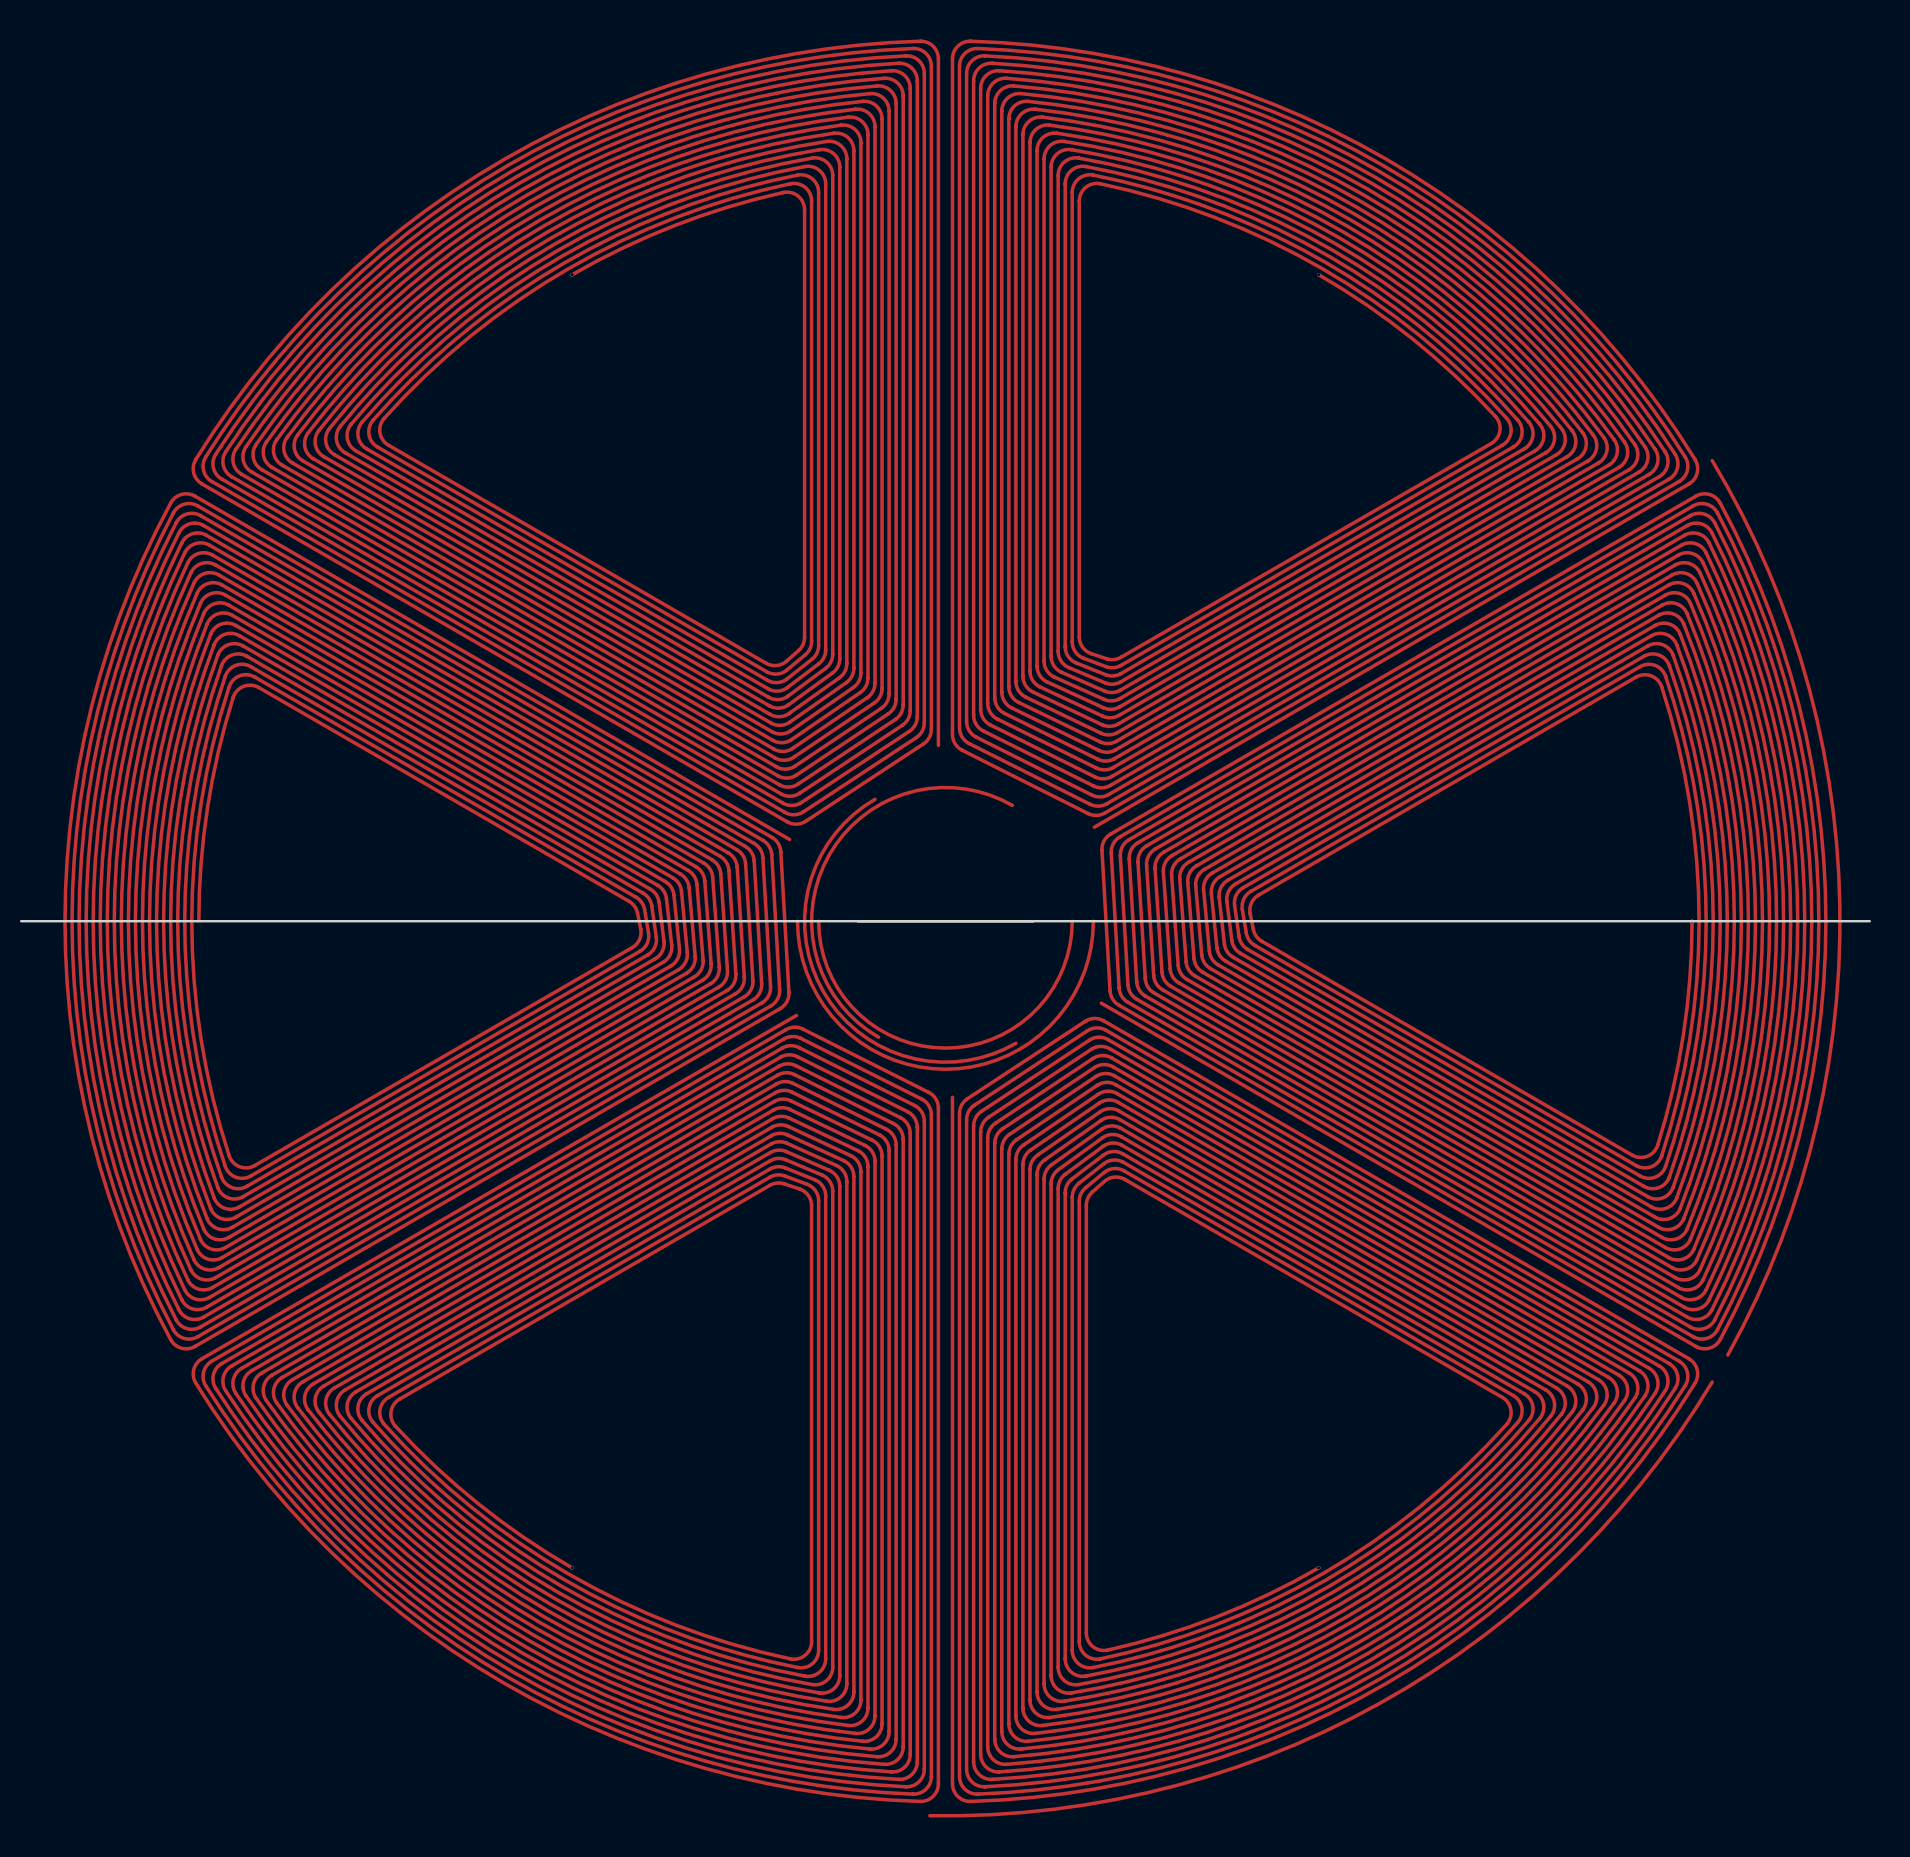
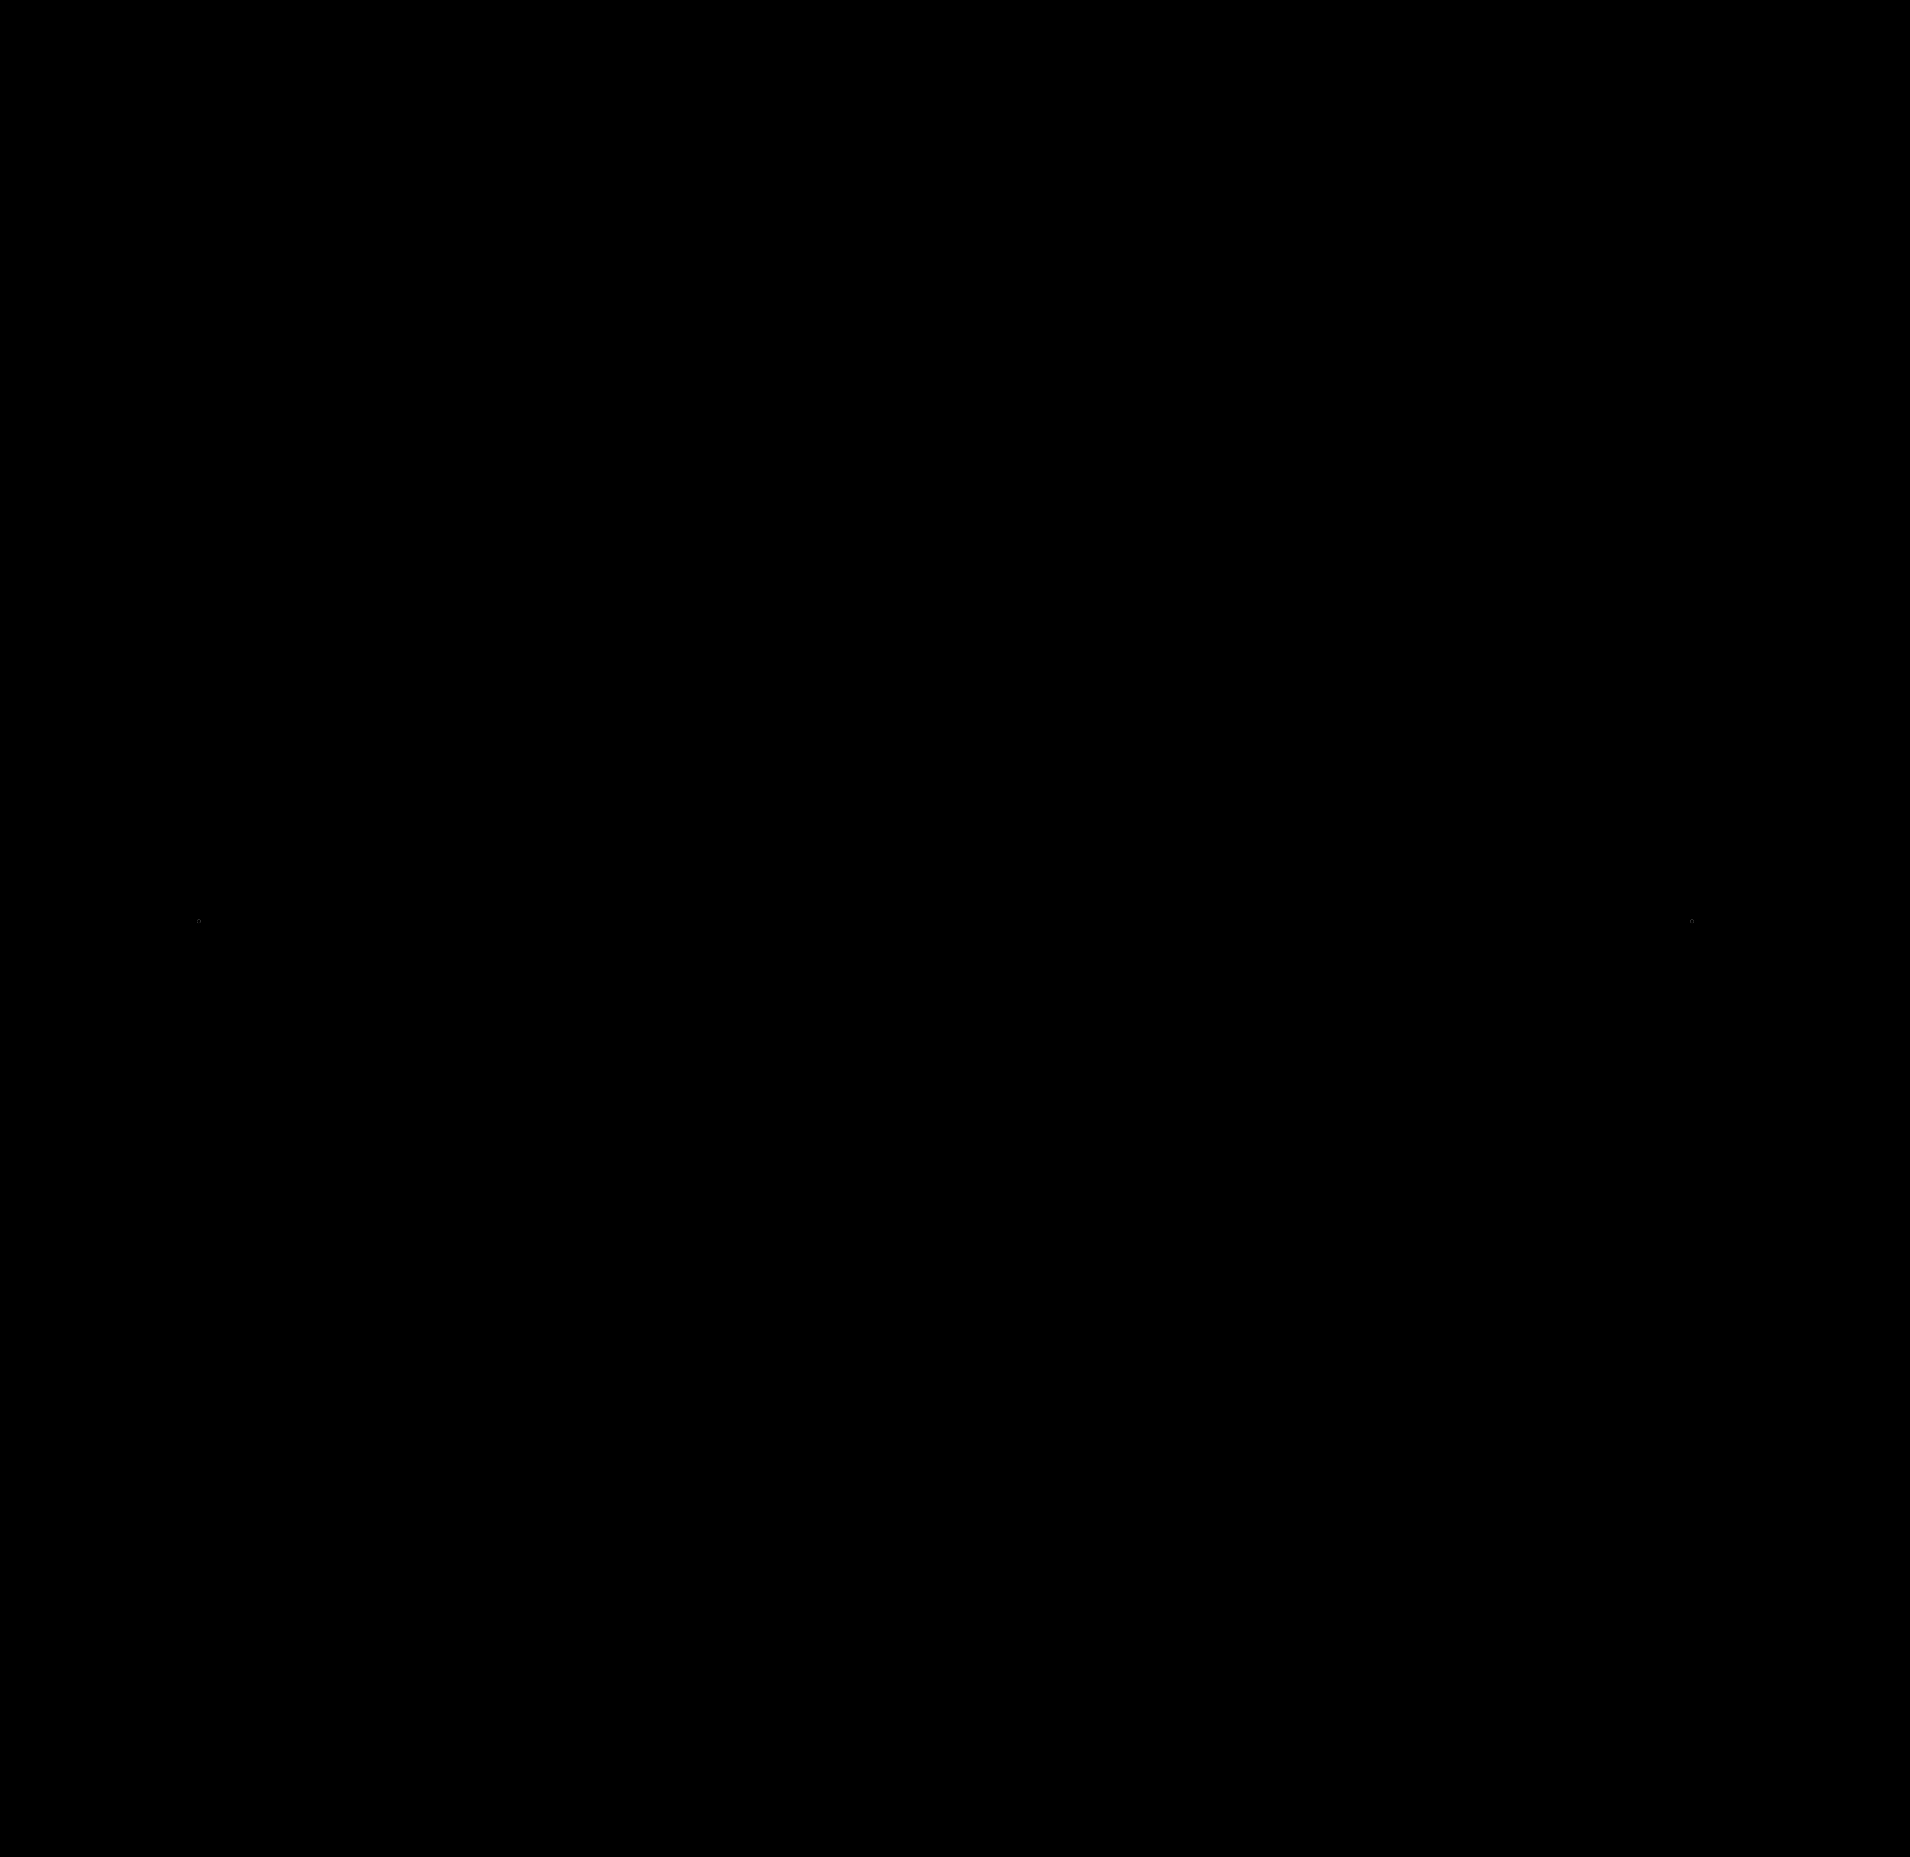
track: (572, 274) (648, 236) (728, 207) (785, 192) (794, 193) (802, 201) (804, 209) (804, 637) (799, 649) (780, 664) (772, 665) (766, 663) (388, 445) (382, 439) (379, 428) (382, 420) (404, 396) (470, 336) (543, 284) (594, 254) (676, 217) (732, 198) (792, 183) (801, 184) (809, 192) (811, 201) (811, 643) (806, 653) (781, 673) (774, 674) (766, 671) (377, 447) (370, 438) (368, 430) (371, 421) (391, 399) (451, 342) (518, 291) (589, 249) (664, 214) (743, 187) (799, 174) (808, 176) (816, 183) (818, 192) (818, 647) (813, 658) (783, 681) (775, 682) (767, 680) (366, 448) (359, 440) (357, 432) (362, 422) (401, 379) (465, 321) (536, 271) (586, 242) (665, 206) (748, 179) (807, 166) (817, 169) (823, 175) (825, 183) (825, 651) (820, 662) (783, 689) (775, 691) (768, 688) (355, 450) (348, 442) (347, 434) (349, 425) (370, 401) (435, 338) (506, 282) (558, 250) (638, 209) (724, 178) (814, 157) (822, 159) (830, 167) (832, 175) (832, 656) (827, 667) (784, 698) (776, 699) (768, 697) (345, 452) (338, 446) (336, 436) (340, 426) (377, 383) (439, 325) (506, 274) (554, 244) (630, 205) (709, 175) (763, 160) (819, 149) (829, 151) (837, 158) (839, 167) (839, 660) (834, 671) (784, 706) (777, 708) (769, 705) (334, 454) (328, 448) (325, 438) (329, 428) (367, 383) (431, 322) (477, 286) (551, 238) (629, 198) (712, 167) (768, 152) (826, 141) (837, 143) (844, 150) (846, 158) (846, 665) (841, 676) (785, 715) (777, 716) (770, 714) (323, 456) (316, 448) (315, 438) (318, 430) (358, 384) (423, 320) (495, 264) (574, 217) (657, 179) (744, 151) (833, 133) (844, 135) (851, 142) (853, 150) (853, 670) (848, 681) (788, 723) (780, 725) (770, 722) (313, 458) (306, 451) (304, 440) (308, 432) (326, 410) (364, 367) (426, 308) (495, 256) (569, 212) (647, 175) (728, 148) (784, 134) (841, 125) (851, 126) (858, 134) (860, 142) (860, 675) (855, 686) (788, 731) (781, 733) (771, 731) (302, 460) (295, 453) (294, 442) (297, 435) (334, 388) (397, 325) (465, 268) (540, 219) (592, 192) (647, 168) (731, 139) (789, 126) (848, 117) (858, 119) (865, 126) (867, 134) (867, 680) (864, 688) (860, 692) (789, 740) (780, 742) (772, 740) (292, 463) (285, 455) (283, 445) (287, 437) (325, 389) (389, 322) (459, 264) (536, 213) (591, 185) (647, 160) (734, 131) (794, 118) (855, 109) (865, 111) (873, 118) (875, 126) (874, 685) (871, 693) (867, 697) (790, 749) (781, 751) (773, 749) (282, 465) (275, 457) (273, 447) (276, 439) (294, 416) (331, 371) (392, 310) (460, 255) (533, 207) (611, 168) (664, 146) (720, 128) (776, 114) (862, 101) (872, 103) (880, 110) (882, 118) (881, 690) (878, 698) (874, 702) (790, 759) (782, 760) (775, 757) (271, 467) (264, 459) (263, 449) (266, 442) (284, 417) (322, 371) (385, 307) (454, 250) (529, 201) (609, 160) (665, 138) (722, 120) (810, 101) (869, 93) (879, 95) (887, 103) (889, 111) (888, 695) (887, 701) (881, 708) (791, 767) (783, 769) (776, 766) (261, 469) (254, 462) (253, 452) (256, 444) (274, 419) (312, 371) (377, 304) (448, 246) (526, 195) (580, 166) (637, 141) (725, 112) (785, 98) (846, 89) (881, 86) (888, 89) (894, 95) (896, 103) (896, 701) (894, 707) (888, 713) (792, 776) (785, 778) (777, 775) (251, 471) (244, 464) (243, 454) (245, 446) (264, 420) (303, 371) (369, 302) (443, 241) (522, 189) (607, 146) (667, 123) (727, 104) (789, 90) (852, 81) (888, 78) (895, 81) (901, 87) (903, 95) (903, 706) (899, 715) (895, 719) (794, 785) (786, 787) (779, 784) (241, 474) (234, 466) (232, 456) (235, 449) (252, 424) (289, 376) (351, 310) (419, 250) (468, 215) (519, 183) (599, 142) (655, 119) (713, 101) (801, 81) (861, 73) (895, 70) (907, 78) (910, 88) (910, 712) (906, 720) (902, 725) (796, 795) (788, 796) (781, 793) (231, 476) (224, 469) (222, 459) (225, 451) (243, 426) (280, 376) (343, 308) (389, 266) (437, 227) (515, 177) (570, 148) (627, 123) (715, 93) (775, 78) (836, 68) (900, 63) (908, 65) (914, 71) (917, 80) (917, 718) (915, 724) (909, 731) (797, 804) (790, 805) (782, 803) (221, 479) (214, 471) (213, 459) (233, 427) (271, 376) (335, 305) (407, 242) (458, 204) (512, 171) (568, 141) (626, 115) (717, 85) (779, 70) (842, 61) (907, 55) (915, 58) (921, 63) (924, 73) (924, 725) (922, 731) (916, 737) (799, 813) (792, 814) (784, 812) (211, 481) (204, 472) (203, 462) (222, 431) (258, 382) (297, 336) (339, 292) (384, 251) (432, 214) (508, 164) (562, 136) (617, 111) (674, 90) (733, 74) (792, 61) (852, 52) (915, 48) (922, 50) (928, 56) (931, 66) (931, 731) (928, 739) (923, 743) (803, 822) (794, 824) (787, 821) (202, 483) (195, 476) (193, 469) (194, 461) (230, 407) (268, 358) (309, 312) (354, 268) (402, 228) (452, 191) (505, 158) (588, 116) (646, 93) (705, 74) (765, 59) (827, 48) (889, 42) (926, 42) (934, 47) (938, 58) (938, 745) -> none
via: (572, 274) -> none
track: (1318, 274) (1389, 321) (1455, 376) (1496, 418) (1500, 428) (1497, 437) (1491, 443) (1120, 657) (1108, 659) (1085, 650) (1081, 645) (1079, 636) (1079, 201) (1081, 192) (1089, 184) (1098, 183) (1129, 190) (1214, 217) (1296, 254) (1347, 284) (1420, 336) (1465, 375) (1508, 420) (1511, 428) (1508, 439) (1502, 445) (1119, 666) (1107, 667) (1078, 655) (1074, 650) (1072, 641) (1072, 192) (1075, 181) (1082, 176) (1091, 174) (1120, 180) (1200, 204) (1276, 236) (1349, 276) (1417, 324) (1479, 379) (1519, 421) (1522, 432) (1519, 440) (1513, 447) (1119, 674) (1107, 675) (1072, 660) (1067, 654) (1065, 646) (1065, 183) (1067, 175) (1075, 167) (1086, 166) (1142, 179) (1225, 206) (1303, 242) (1354, 271) (1424, 321) (1489, 379) (1530, 423) (1533, 434) (1530, 442) (1524, 448) (1118, 682) (1107, 683) (1065, 665) (1060, 659) (1058, 651) (1058, 175) (1060, 167) (1068, 159) (1076, 157) (1108, 163) (1195, 188) (1279, 222) (1332, 250) (1408, 300) (1477, 358) (1541, 425) (1543, 436) (1541, 444) (1535, 450) (1118, 691) (1106, 691) (1058, 670) (1052, 664) (1051, 656) (1051, 167) (1054, 156) (1060, 151) (1071, 149) (1126, 160) (1208, 184) (1286, 217) (1336, 244) (1407, 290) (1472, 344) (1513, 383) (1550, 426) (1554, 436) (1551, 446) (1545, 452) (1118, 699) (1105, 700) (1050, 675) (1045, 668) (1044, 661) (1044, 158) (1046, 150) (1053, 143) (1064, 141) (1122, 152) (1206, 176) (1287, 210) (1339, 238) (1413, 286) (1481, 342) (1523, 383) (1561, 428) (1565, 438) (1562, 448) (1556, 454) (1117, 707) (1105, 708) (1043, 679) (1038, 673) (1037, 666) (1037, 150) (1040, 140) (1048, 134) (1057, 133) (1117, 144) (1204, 168) (1289, 203) (1369, 247) (1443, 300) (1511, 362) (1572, 430) (1575, 440) (1573, 450) (1567, 456) (1117, 716) (1104, 716) (1038, 686) (1031, 678) (1029, 671) (1029, 142) (1033, 132) (1041, 126) (1049, 125) (1078, 129) (1134, 140) (1216, 165) (1296, 199) (1371, 240) (1441, 290) (1506, 346) (1546, 388) (1582, 432) (1586, 442) (1583, 452) (1577, 458) (1116, 724) (1103, 725) (1031, 691) (1025, 685) (1022, 676) (1022, 134) (1026, 124) (1034, 118) (1042, 117) (1101, 126) (1187, 148) (1271, 179) (1350, 219) (1400, 251) (1448, 286) (1515, 345) (1555, 388) (1593, 435) (1596, 444) (1594, 455) (1587, 460) (1115, 733) (1109, 734) (1101, 733) (1024, 696) (1017, 688) (1015, 681) (1015, 126) (1018, 116) (1027, 110) (1035, 109) (1096, 118) (1185, 140) (1271, 172) (1353, 213) (1430, 264) (1478, 302) (1523, 344) (1565, 389) (1603, 437) (1607, 447) (1604, 457) (1598, 463) (1114, 742) (1108, 743) (1100, 741) (1017, 701) (1010, 694) (1008, 686) (1008, 118) (1011, 109) (1019, 102) (1028, 101) (1057, 104) (1114, 114) (1198, 137) (1279, 168) (1357, 207) (1406, 238) (1453, 272) (1519, 329) (1559, 371) (1614, 439) (1617, 449) (1614, 459) (1608, 465) (1113, 750) (1105, 752) (1099, 750) (1008, 705) (1003, 699) (1001, 692) (1001, 111) (1004, 101) (1012, 94) (1021, 93) (1050, 96) (1109, 106) (1196, 129) (1280, 160) (1361, 201) (1411, 233) (1460, 268) (1527, 328) (1588, 394) (1624, 442) (1627, 451) (1624, 461) (1618, 467) (1112, 759) (1106, 761) (1097, 759) (1001, 711) (996, 705) (994, 697) (994, 103) (997, 93) (1005, 87) (1013, 85) (1044, 89) (1105, 98) (1195, 121) (1281, 153) (1364, 195) (1416, 228) (1466, 264) (1535, 326) (1577, 371) (1616, 419) (1636, 448) (1637, 456) (1635, 464) (1629, 469) (1111, 768) (1102, 769) (1096, 768) (994, 717) (989, 710) (987, 703) (987, 95) (990, 86) (998, 79) (1006, 78) (1038, 81) (1101, 90) (1193, 113) (1282, 146) (1368, 189) (1447, 241) (1497, 281) (1543, 324) (1587, 371) (1626, 420) (1646, 450) (1647, 458) (1645, 466) (1639, 471) (1109, 777) (1103, 778) (1095, 777) (987, 722) (982, 716) (980, 709) (980, 88) (983, 78) (991, 72) (999, 70) (1029, 73) (1089, 81) (1177, 101) (1234, 119) (1290, 142) (1371, 183) (1422, 215) (1471, 250) (1539, 310) (1581, 353) (1637, 424) (1656, 452) (1656, 466) (1649, 474) (1108, 786) (1099, 787) (1093, 785) (980, 728) (975, 722) (973, 715) (973, 80) (976, 71) (984, 64) (992, 63) (1023, 65) (1084, 73) (1175, 93) (1263, 123) (1320, 148) (1375, 177) (1427, 210) (1477, 246) (1547, 308) (1590, 353) (1629, 401) (1666, 453) (1668, 461) (1666, 469) (1659, 476) (1106, 795) (1100, 796) (1091, 795) (973, 735) (968, 728) (966, 721) (966, 73) (970, 62) (978, 56) (1016, 57) (1080, 65) (1173, 85) (1234, 104) (1293, 127) (1378, 171) (1432, 204) (1483, 242) (1555, 305) (1598, 352) (1638, 401) (1676, 456) (1677, 463) (1676, 471) (1669, 479) (1104, 804) (1098, 806) (1090, 804) (965, 741) (961, 735) (959, 727) (959, 66) (963, 54) (971, 49) (1008, 50) (1068, 56) (1128, 67) (1187, 82) (1244, 100) (1301, 123) (1382, 164) (1433, 197) (1482, 232) (1529, 271) (1572, 313) (1613, 358) (1651, 406) (1686, 458) (1687, 466) (1685, 474) (1679, 481) (1102, 814) (1094, 815) (1088, 813) (960, 749) (955, 743) (952, 734) (952, 58) (955, 49) (961, 43) (968, 41) (1032, 45) (1094, 53) (1155, 66) (1215, 83) (1273, 104) (1330, 129) (1385, 158) (1463, 209) (1512, 248) (1559, 289) (1602, 334) (1641, 382) (1678, 433) (1697, 465) (1695, 476) (1688, 483) (1094, 827) -> none
via: (1318, 274) -> none
track: (1712, 460) (1742, 515) (1768, 571) (1800, 659) (1817, 720) (1828, 781) (1836, 843) (1839, 905) (1836, 999) (1828, 1061) (1817, 1122) (1800, 1182) (1780, 1241) (1756, 1299) (1727, 1355) -> none
track: (875, 799) (853, 814) (835, 833) (821, 854) (811, 878) (805, 904) (806, 942) (812, 968) (823, 991) (838, 1012) (857, 1031) (890, 1051) (915, 1058) (941, 1062) (967, 1060) (992, 1054) (1015, 1043) -> none
track: (1012, 805) (989, 795) (965, 789) (941, 787) (916, 790) (893, 798) (871, 809) (852, 825) (829, 854) (819, 876) (813, 900) (812, 937) (817, 961) (827, 984) (841, 1005) (858, 1022) (878, 1037) -> none
track: (789, 839) (194, 496) (185, 493) (174, 498) (156, 530) (130, 587) (109, 645) (91, 705) (78, 766) (69, 828) (64, 921) (67, 983) (73, 1045) (84, 1106) (99, 1167) (119, 1226) (143, 1283) (171, 1341) (177, 1346) (185, 1348) (194, 1346) (780, 1008) (786, 1001) (788, 994) (780, 851) (779, 845) (773, 838) (197, 505) (188, 503) (180, 505) (174, 511) (146, 567) (124, 623) (105, 681) (90, 740) (80, 800) (74, 860) (72, 921) (76, 1012) (85, 1072) (97, 1131) (114, 1190) (135, 1247) (159, 1302) (177, 1334) (188, 1339) (197, 1336) (770, 1005) (776, 1000) (779, 993) (771, 854) (770, 848) (764, 841) (200, 515) (190, 513) (183, 515) (177, 521) (148, 580) (126, 639) (107, 700) (93, 762) (84, 825) (79, 921) (81, 984) (88, 1048) (107, 1141) (136, 1232) (162, 1291) (179, 1324) (190, 1329) (200, 1326) (761, 1002) (767, 997) (770, 990) (762, 857) (761, 851) (755, 844) (203, 525) (193, 523) (185, 525) (180, 531) (152, 589) (131, 647) (113, 706) (100, 767) (91, 828) (86, 921) (91, 1014) (100, 1075) (113, 1136) (141, 1224) (165, 1281) (178, 1309) (184, 1316) (193, 1319) (203, 1317) (752, 999) (758, 994) (761, 987) (754, 860) (751, 852) (747, 847) (206, 535) (196, 532) (184, 539) (168, 570) (146, 625) (119, 712) (101, 801) (95, 861) (93, 921) (95, 981) (101, 1041) (119, 1130) (146, 1216) (168, 1272) (181, 1299) (187, 1306) (196, 1309) (206, 1307) (744, 996) (749, 991) (752, 984) (745, 863) (744, 857) (738, 850) (209, 545) (201, 542) (193, 544) (187, 549) (171, 581) (148, 640) (129, 701) (109, 794) (102, 857) (100, 921) (105, 1016) (121, 1110) (148, 1201) (171, 1261) (184, 1289) (189, 1296) (199, 1299) (209, 1297) (735, 993) (741, 988) (744, 981) (737, 867) (734, 858) (730, 854) (212, 555) (204, 552) (196, 554) (189, 559) (175, 590) (152, 648) (134, 707) (121, 767) (112, 828) (107, 921) (112, 1013) (127, 1105) (152, 1194) (175, 1251) (187, 1279) (192, 1286) (202, 1289) (212, 1287) (727, 990) (732, 985) (735, 977) (728, 870) (726, 862) (721, 857) (215, 565) (207, 562) (197, 565) (190, 572) (167, 628) (140, 713) (127, 772) (119, 831) (114, 921) (119, 1011) (133, 1099) (157, 1186) (178, 1242) (190, 1269) (195, 1276) (205, 1279) (215, 1277) (718, 987) (724, 981) (727, 974) (720, 873) (718, 865) (713, 860) (218, 575) (210, 572) (200, 575) (193, 583) (162, 664) (146, 720) (134, 776) (125, 834) (121, 921) (125, 1008) (139, 1094) (162, 1178) (182, 1232) (193, 1259) (199, 1266) (208, 1269) (218, 1267) (710, 983) (716, 978) (719, 969) (712, 877) (711, 870) (705, 864) (222, 585) (214, 582) (203, 585) (197, 593) (174, 650) (156, 708) (142, 768) (133, 829) (128, 921) (133, 1013) (149, 1103) (174, 1192) (197, 1249) (202, 1256) (211, 1259) (222, 1257) (702, 980) (708, 974) (711, 965) (704, 880) (703, 874) (697, 867) (225, 595) (217, 592) (207, 595) (200, 603) (179, 658) (161, 715) (144, 802) (137, 861) (135, 921) (140, 1010) (154, 1098) (179, 1183) (200, 1239) (205, 1245) (215, 1249) (225, 1247) (694, 976) (700, 971) (703, 962) (696, 882) (689, 871) (228, 605) (220, 602) (210, 605) (203, 613) (183, 667) (167, 722) (150, 806) (142, 892) (144, 978) (155, 1064) (175, 1147) (193, 1202) (203, 1228) (208, 1235) (218, 1239) (228, 1237) (686, 973) (692, 967) (695, 958) (688, 885) (682, 875) (232, 615) (224, 612) (213, 615) (207, 623) (177, 710) (158, 799) (150, 890) (151, 982) (164, 1072) (186, 1161) (207, 1218) (212, 1225) (221, 1229) (232, 1227) (678, 969) (684, 964) (687, 956) (681, 889) (674, 878) (235, 625) (227, 623) (217, 626) (210, 634) (191, 689) (176, 746) (161, 833) (156, 921) (158, 980) (170, 1067) (191, 1152) (210, 1208) (217, 1216) (225, 1219) (235, 1217) (670, 966) (676, 960) (679, 953) (673, 892) (666, 882) (239, 635) (231, 633) (220, 636) (214, 644) (196, 698) (181, 753) (168, 836) (163, 921) (168, 1005) (176, 1061) (196, 1144) (214, 1197) (220, 1206) (228, 1209) (239, 1206) (663, 962) (668, 956) (671, 949) (666, 896) (659, 886) (243, 645) (234, 643) (226, 645) (218, 653) (191, 741) (175, 830) (170, 921) (175, 1011) (185, 1071) (207, 1158) (218, 1189) (224, 1195) (234, 1199) (243, 1196) (655, 958) (661, 953) (664, 945) (658, 900) (652, 890) (246, 656) (238, 653) (228, 657) (222, 663) (204, 720) (186, 805) (178, 892) (178, 950) (186, 1036) (204, 1121) (221, 1176) (228, 1185) (238, 1188) (246, 1186) (647, 954) (653, 949) (656, 941) (651, 903) (644, 894) (250, 666) (242, 664) (233, 666) (226, 674) (209, 729) (192, 810) (185, 893) (186, 976) (197, 1059) (216, 1140) (226, 1168) (231, 1175) (242, 1178) (250, 1175) (639, 951) (646, 945) (648, 939) (644, 907) (637, 898) (254, 677) (246, 674) (235, 677) (230, 684) (212, 744) (197, 832) (192, 891) (194, 980) (201, 1040) (220, 1127) (230, 1157) (235, 1164) (243, 1167) (254, 1165) (632, 947) (637, 943) (640, 935) (637, 911) (629, 901) (258, 687) (250, 685) (239, 688) (233, 695) (218, 752) (203, 836) (198, 921) -> none
track: (797, 921) (799, 947) (806, 971) (824, 1006) (840, 1025) (860, 1042) (894, 1060) (919, 1066) (945, 1069) (971, 1066) (996, 1060) (1030, 1042) (1050, 1025) (1066, 1006) (1084, 971) (1091, 947) (1093, 921) -> none
track: (818, 921) (820, 944) (827, 967) (837, 988) (851, 1006) (869, 1022) (899, 1039) (922, 1045) (945, 1048) (968, 1045) (991, 1039) (1012, 1029) (1030, 1015) (1053, 988) (1063, 967) (1070, 944) (1072, 921) -> none
track: (1692, 921) (1687, 1006) (1672, 1090) (1656, 1147) (1651, 1154) (1640, 1157) (1632, 1155) (1261, 941) (1253, 931) (1250, 907) (1253, 899) (1258, 895) (1636, 677) (1646, 674) (1655, 677) (1660, 684) (1670, 715) (1689, 802) (1696, 861) (1698, 951) (1689, 1040) (1677, 1098) (1660, 1157) (1655, 1164) (1644, 1167) (1636, 1165) (1253, 944) (1246, 934) (1242, 903) (1244, 897) (1250, 891) (1640, 666) (1648, 664) (1659, 667) (1664, 674) (1674, 702) (1693, 783) (1704, 865) (1705, 949) (1698, 1031) (1681, 1113) (1664, 1168) (1657, 1176) (1648, 1178) (1640, 1175) (1246, 948) (1239, 938) (1234, 901) (1237, 893) (1243, 887) (1643, 656) (1652, 653) (1662, 657) (1669, 665) (1686, 720) (1704, 805) (1711, 863) (1712, 950) (1704, 1036) (1686, 1121) (1668, 1178) (1660, 1186) (1652, 1188) (1643, 1186) (1238, 952) (1232, 942) (1226, 897) (1229, 889) (1235, 883) (1647, 645) (1656, 643) (1666, 646) (1672, 653) (1682, 683) (1705, 771) (1717, 861) (1720, 921) (1714, 1011) (1699, 1100) (1672, 1189) (1664, 1197) (1656, 1199) (1647, 1196) (1231, 956) (1224, 946) (1219, 893) (1221, 885) (1227, 880) (1651, 635) (1659, 633) (1670, 636) (1676, 644) (1694, 698) (1714, 780) (1722, 836) (1727, 921) (1722, 1005) (1708, 1089) (1694, 1144) (1676, 1197) (1670, 1206) (1659, 1209) (1651, 1206) (1223, 959) (1217, 949) (1211, 889) (1214, 882) (1220, 876) (1655, 625) (1663, 623) (1673, 626) (1680, 634) (1699, 689) (1720, 775) (1729, 833) (1734, 921) (1729, 1009) (1714, 1096) (1699, 1152) (1680, 1208) (1673, 1216) (1663, 1219) (1655, 1217) (1216, 963) (1209, 953) (1203, 885) (1206, 878) (1212, 872) (1658, 615) (1668, 613) (1678, 617) (1683, 623) (1704, 681) (1726, 769) (1739, 860) (1740, 951) (1732, 1042) (1712, 1132) (1683, 1218) (1677, 1226) (1666, 1229) (1658, 1227) (1208, 967) (1202, 956) (1195, 884) (1197, 876) (1204, 869) (1662, 605) (1672, 602) (1682, 606) (1687, 613) (1697, 640) (1715, 694) (1735, 778) (1746, 863) (1747, 950) (1740, 1035) (1723, 1120) (1707, 1175) (1687, 1228) (1680, 1237) (1670, 1239) (1662, 1237) (1200, 971) (1194, 960) (1187, 880) (1190, 871) (1196, 865) (1665, 595) (1675, 592) (1685, 596) (1690, 603) (1711, 658) (1735, 744) (1750, 832) (1755, 921) (1753, 980) (1746, 1039) (1728, 1126) (1711, 1183) (1690, 1239) (1683, 1247) (1673, 1249) (1665, 1247) (1193, 974) (1187, 968) (1186, 961) (1179, 876) (1182, 867) (1188, 862) (1668, 585) (1678, 582) (1688, 586) (1693, 593) (1716, 650) (1741, 738) (1757, 829) (1762, 921) (1757, 1013) (1748, 1073) (1734, 1133) (1716, 1192) (1693, 1249) (1686, 1257) (1676, 1259) (1668, 1257) (1185, 978) (1179, 971) (1178, 965) (1171, 873) (1174, 864) (1180, 858) (1672, 575) (1682, 572) (1691, 576) (1696, 583) (1708, 609) (1728, 664) (1751, 748) (1764, 834) (1769, 921) (1767, 979) (1761, 1037) (1744, 1122) (1728, 1178) (1696, 1259) (1690, 1267) (1680, 1269) (1672, 1267) (1177, 981) (1172, 976) (1170, 968) (1163, 868) (1166, 860) (1172, 855) (1675, 565) (1685, 562) (1694, 566) (1700, 572) (1712, 600) (1733, 656) (1757, 742) (1771, 831) (1776, 921) (1771, 1011) (1763, 1070) (1750, 1128) (1723, 1214) (1700, 1269) (1693, 1277) (1683, 1279) (1675, 1277) (1168, 985) (1164, 980) (1161, 972) (1155, 864) (1158, 857) (1163, 852) (1678, 555) (1688, 552) (1697, 556) (1703, 562) (1715, 590) (1738, 648) (1763, 737) (1778, 828) (1783, 921) (1778, 1013) (1769, 1074) (1755, 1135) (1738, 1194) (1715, 1251) (1700, 1283) (1694, 1288) (1686, 1289) (1678, 1287) (1160, 988) (1155, 981) (1153, 975) (1146, 861) (1149, 854) (1155, 848) (1681, 545) (1691, 542) (1700, 546) (1706, 552) (1719, 581) (1742, 640) (1769, 732) (1785, 826) (1790, 921) (1785, 1016) (1775, 1079) (1761, 1141) (1742, 1201) (1719, 1261) (1703, 1293) (1697, 1298) (1689, 1299) (1681, 1297) (1152, 991) (1146, 985) (1145, 978) (1138, 858) (1141, 851) (1146, 845) (1684, 535) (1694, 532) (1703, 536) (1709, 542) (1721, 570) (1744, 625) (1771, 712) (1784, 771) (1792, 830) (1797, 921) (1795, 981) (1789, 1041) (1771, 1130) (1744, 1216) (1721, 1272) (1706, 1303) (1694, 1309) (1684, 1307) (1143, 994) (1139, 990) (1136, 981) (1129, 855) (1132, 847) (1138, 842) (1687, 525) (1697, 523) (1706, 526) (1711, 532) (1725, 560) (1749, 617) (1777, 706) (1790, 767) (1799, 828) (1804, 921) (1799, 1014) (1790, 1075) (1777, 1136) (1759, 1195) (1737, 1253) (1710, 1311) (1704, 1317) (1697, 1319) (1687, 1317) (1134, 998) (1129, 991) (1128, 985) (1120, 852) (1123, 844) (1129, 839) (1690, 515) (1700, 513) (1711, 518) (1728, 551) (1753, 609) (1783, 700) (1797, 762) (1806, 825) (1811, 921) (1806, 1016) (1797, 1079) (1783, 1141) (1764, 1202) (1741, 1262) (1713, 1321) (1707, 1327) (1700, 1329) (1690, 1326) (1126, 1001) (1120, 994) (1119, 988) (1111, 849) (1114, 842) (1120, 836) (1693, 505) (1704, 503) (1713, 508) (1731, 540) (1755, 595) (1776, 652) (1793, 710) (1810, 800) (1816, 860) (1818, 921) (1816, 981) (1810, 1042) (1799, 1102) (1785, 1161) (1766, 1218) (1743, 1275) (1716, 1331) (1710, 1336) (1702, 1339) (1693, 1336) (1117, 1003) (1111, 997) (1110, 990) (1101, 848) (1105, 839) (1110, 834) (1695, 496) (1705, 493) (1713, 496) (1719, 501) (1747, 558) (1771, 616) (1790, 675) (1806, 735) (1817, 797) (1823, 859) (1825, 921) (1820, 1014) (1812, 1076) (1799, 1137) (1781, 1196) (1760, 1255) (1734, 1311) (1716, 1344) (1705, 1348) (1695, 1346) (1101, 1003) -> none
board edge: (1869, 921) (20, 921) (1869, 921) -> none
track: (796, 1015) (202, 1358) (195, 1365) (193, 1377) (212, 1409) (248, 1459) (288, 1507) (331, 1552) (377, 1594) (426, 1632) (505, 1683) (560, 1713) (617, 1738) (675, 1759) (735, 1776) (796, 1789) (858, 1797) (922, 1801) (929, 1798) (935, 1793) (938, 1783) (938, 1108) (935, 1098) (930, 1093) (802, 1029) (796, 1027) (788, 1028) (211, 1361) (204, 1368) (203, 1376) (204, 1383) (239, 1435) (277, 1483) (317, 1528) (361, 1570) (408, 1609) (457, 1645) (508, 1677) (589, 1719) (646, 1741) (703, 1760) (762, 1775) (822, 1786) (882, 1792) (919, 1793) (927, 1787) (931, 1776) (931, 1114) (929, 1107) (924, 1101) (800, 1038) (792, 1036) (786, 1037) (221, 1363) (214, 1370) (212, 1378) (214, 1386) (251, 1440) (292, 1490) (335, 1536) (406, 1600) (458, 1637) (512, 1671) (597, 1714) (656, 1738) (717, 1757) (810, 1777) (874, 1784) (911, 1786) (920, 1780) (924, 1769) (924, 1121) (922, 1113) (917, 1107) (798, 1047) (790, 1045) (784, 1047) (231, 1365) (224, 1373) (222, 1381) (224, 1389) (261, 1441) (300, 1489) (343, 1534) (413, 1595) (463, 1632) (515, 1665) (570, 1694) (627, 1719) (715, 1749) (806, 1769) (867, 1777) (898, 1779) (906, 1777) (914, 1771) (917, 1761) (917, 1127) (915, 1119) (910, 1113) (797, 1056) (791, 1054) (782, 1056) (241, 1368) (234, 1375) (233, 1389) (252, 1418) (309, 1488) (351, 1532) (419, 1591) (468, 1627) (519, 1659) (572, 1687) (627, 1712) (713, 1741) (801, 1761) (861, 1769) (891, 1771) (899, 1770) (907, 1764) (910, 1754) (910, 1133) (908, 1125) (903, 1119) (795, 1065) (787, 1063) (781, 1065) (251, 1370) (245, 1376) (243, 1383) (244, 1392) (264, 1421) (303, 1471) (346, 1518) (393, 1561) (443, 1601) (522, 1653) (607, 1696) (697, 1729) (789, 1752) (852, 1761) (884, 1764) (892, 1763) (900, 1756) (903, 1746) (903, 1139) (901, 1131) (896, 1125) (794, 1074) (788, 1072) (779, 1074) (261, 1372) (255, 1378) (253, 1386) (254, 1394) (274, 1423) (312, 1471) (355, 1516) (424, 1577) (474, 1614) (526, 1647) (608, 1689) (695, 1721) (785, 1744) (846, 1753) (877, 1756) (885, 1755) (893, 1748) (896, 1739) (896, 1145) (894, 1137) (889, 1131) (793, 1083) (784, 1081) (778, 1082) (271, 1375) (265, 1380) (263, 1390) (266, 1400) (302, 1448) (363, 1514) (407, 1554) (454, 1592) (529, 1641) (609, 1681) (694, 1713) (780, 1736) (840, 1745) (869, 1749) (878, 1747) (886, 1741) (889, 1731) (889, 1150) (887, 1142) (882, 1136) (791, 1092) (783, 1090) (777, 1091) (282, 1377) (276, 1383) (273, 1393) (276, 1402) (331, 1470) (371, 1512) (437, 1570) (484, 1604) (533, 1635) (611, 1674) (692, 1705) (776, 1727) (833, 1737) (862, 1741) (870, 1740) (879, 1733) (882, 1723) (882, 1155) (880, 1148) (873, 1141) (790, 1100) (782, 1099) (776, 1100) (292, 1379) (286, 1385) (283, 1395) (287, 1405) (325, 1453) (367, 1498) (411, 1540) (459, 1578) (536, 1628) (619, 1670) (705, 1702) (794, 1724) (855, 1733) (863, 1732) (871, 1725) (875, 1715) (875, 1161) (873, 1153) (866, 1146) (789, 1109) (781, 1107) (775, 1109) (302, 1381) (296, 1387) (294, 1397) (297, 1407) (334, 1453) (375, 1497) (442, 1556) (490, 1591) (540, 1622) (619, 1663) (703, 1694) (789, 1716) (848, 1725) (856, 1724) (864, 1718) (867, 1708) (867, 1166) (865, 1157) (859, 1151) (787, 1117) (774, 1117) (313, 1383) (307, 1389) (304, 1399) (308, 1409) (344, 1454) (384, 1495) (448, 1552) (519, 1601) (594, 1643) (673, 1677) (756, 1701) (812, 1713) (841, 1717) (849, 1716) (857, 1710) (860, 1700) (860, 1171) (859, 1163) (852, 1156) (786, 1125) (773, 1126) (323, 1385) (317, 1391) (315, 1402) (318, 1412) (379, 1480) (446, 1541) (521, 1594) (601, 1639) (685, 1673) (773, 1698) (833, 1709) (842, 1708) (850, 1702) (853, 1691) (853, 1176) (852, 1168) (847, 1162) (785, 1134) (773, 1134) (334, 1387) (328, 1393) (325, 1404) (329, 1414) (367, 1458) (409, 1500) (477, 1556) (551, 1604) (602, 1631) (684, 1665) (768, 1690) (826, 1701) (837, 1699) (844, 1692) (846, 1683) (846, 1181) (845, 1173) (839, 1167) (784, 1142) (772, 1143) (345, 1389) (338, 1395) (336, 1406) (340, 1416) (377, 1458) (417, 1498) (483, 1552) (554, 1598) (630, 1636) (682, 1657) (763, 1681) (819, 1692) (829, 1691) (836, 1685) (839, 1675) (839, 1186) (837, 1178) (832, 1172) (784, 1150) (772, 1151) (355, 1391) (349, 1397) (347, 1406) (349, 1416) (413, 1484) (482, 1542) (558, 1592) (611, 1620) (695, 1654) (782, 1678) (814, 1684) (822, 1683) (830, 1675) (832, 1667) (832, 1191) (830, 1183) (825, 1177) (783, 1159) (771, 1159) (366, 1393) (360, 1399) (357, 1408) (360, 1418) (401, 1462) (465, 1520) (536, 1571) (612, 1613) (665, 1636) (748, 1663) (804, 1676) (815, 1674) (823, 1667) (825, 1658) (825, 1196) (823, 1187) (818, 1181) (783, 1167) (771, 1168) (377, 1395) (371, 1401) (368, 1410) (371, 1420) (411, 1462) (473, 1517) (541, 1565) (614, 1606) (690, 1638) (770, 1661) (799, 1667) (808, 1666) (815, 1660) (818, 1650) (818, 1200) (816, 1192) (812, 1187) (782, 1175) (771, 1176) (388, 1397) (382, 1403) (379, 1414) (382, 1422) (425, 1467) (494, 1524) (543, 1558) (594, 1588) (676, 1625) (761, 1652) (792, 1659) (801, 1657) (809, 1650) (811, 1641) (811, 1205) (809, 1197) (805, 1192) (782, 1183) (769, 1185) (399, 1399) (393, 1405) (390, 1413) (394, 1424) (435, 1466) (500, 1521) (572, 1567) -> none
track: (952, 1097) (952, 1783) (956, 1794) (964, 1800) (1001, 1799) (1063, 1793) (1124, 1783) (1185, 1768) (1244, 1749) (1302, 1726) (1385, 1683) (1438, 1650) (1488, 1614) (1536, 1574) (1580, 1530) (1622, 1484) (1660, 1434) (1696, 1381) (1697, 1373) (1695, 1365) (1688, 1358) (1103, 1020) (1096, 1018) (1086, 1020) (967, 1098) (962, 1103) (959, 1111) (959, 1776) (962, 1786) (968, 1791) (975, 1794) (1038, 1789) (1098, 1781) (1157, 1768) (1216, 1751) (1273, 1730) (1328, 1706) (1382, 1677) (1433, 1645) (1482, 1609) (1551, 1550) (1593, 1506) (1632, 1460) (1668, 1411) (1687, 1380) (1686, 1370) (1679, 1361) (1105, 1030) (1098, 1027) (1090, 1029) (974, 1105) (968, 1111) (966, 1117) (966, 1769) (969, 1778) (975, 1784) (982, 1786) (1048, 1781) (1111, 1771) (1173, 1757) (1234, 1738) (1293, 1714) (1378, 1671) (1432, 1637) (1483, 1600) (1555, 1536) (1619, 1465) (1657, 1414) (1677, 1382) (1676, 1370) (1669, 1363) (1107, 1039) (1100, 1037) (1092, 1038) (981, 1111) (976, 1115) (973, 1123) (973, 1761) (976, 1771) (982, 1777) (990, 1779) (1053, 1773) (1115, 1763) (1175, 1749) (1263, 1719) (1320, 1694) (1375, 1665) (1453, 1614) (1501, 1576) (1547, 1534) (1610, 1465) (1647, 1416) (1665, 1390) (1667, 1383) (1666, 1373) (1659, 1365) (1109, 1048) (1102, 1046) (1094, 1047) (988, 1117) (983, 1121) (980, 1129) (980, 1754) (983, 1764) (995, 1771) (1029, 1769) (1089, 1761) (1177, 1741) (1234, 1722) (1290, 1700) (1371, 1659) (1422, 1627) (1471, 1591) (1539, 1532) (1601, 1465) (1637, 1418) (1655, 1393) (1657, 1385) (1656, 1375) (1649, 1368) (1111, 1057) (1104, 1055) (1096, 1056) (995, 1123) (990, 1127) (987, 1135) (987, 1746) (989, 1754) (994, 1760) (1002, 1764) (1038, 1761) (1101, 1752) (1163, 1738) (1253, 1708) (1311, 1682) (1368, 1653) (1447, 1601) (1521, 1540) (1587, 1471) (1626, 1421) (1644, 1395) (1647, 1388) (1646, 1378) (1639, 1370) (1113, 1066) (1105, 1064) (1097, 1065) (1002, 1128) (997, 1133) (994, 1141) (994, 1739) (996, 1747) (1002, 1753) (1009, 1756) (1044, 1753) (1105, 1744) (1165, 1730) (1253, 1700) (1309, 1676) (1364, 1647) (1442, 1596) (1513, 1537) (1577, 1471) (1616, 1423) (1634, 1398) (1637, 1390) (1636, 1380) (1629, 1372) (1114, 1075) (1107, 1073) (1099, 1074) (1009, 1134) (1003, 1140) (1001, 1146) (1001, 1731) (1003, 1739) (1010, 1746) (1021, 1749) (1080, 1741) (1168, 1722) (1253, 1693) (1308, 1669) (1361, 1641) (1436, 1592) (1505, 1535) (1568, 1471) (1606, 1424) (1624, 1400) (1627, 1392) (1625, 1382) (1618, 1375) (1115, 1084) (1108, 1082) (1100, 1083) (1016, 1139) (1012, 1144) (1008, 1152) (1008, 1723) (1010, 1731) (1018, 1739) (1028, 1741) (1085, 1733) (1170, 1714) (1253, 1685) (1306, 1662) (1357, 1635) (1430, 1587) (1498, 1532) (1559, 1470) (1596, 1426) (1614, 1402) (1617, 1395) (1615, 1385) (1608, 1377) (1116, 1093) (1109, 1091) (1099, 1093) (1023, 1144) (1019, 1149) (1016, 1157) (1015, 1715) (1017, 1724) (1025, 1731) (1035, 1733) (1096, 1724) (1155, 1710) (1243, 1682) (1299, 1657) (1353, 1628) (1430, 1578) (1501, 1519) (1565, 1453) (1603, 1405) (1606, 1397) (1605, 1387) (1598, 1379) (1118, 1102) (1108, 1099) (1100, 1102) (1030, 1150) (1026, 1154) (1023, 1162) (1022, 1708) (1024, 1716) (1032, 1723) (1042, 1725) (1101, 1716) (1159, 1702) (1215, 1684) (1271, 1663) (1350, 1622) (1425, 1574) (1493, 1517) (1555, 1453) (1593, 1407) (1596, 1399) (1595, 1389) (1587, 1381) (1119, 1111) (1109, 1108) (1101, 1110) (1035, 1156) (1030, 1167) (1029, 1700) (1032, 1708) (1039, 1715) (1049, 1717) (1106, 1707) (1162, 1694) (1243, 1666) (1321, 1630) (1395, 1586) (1464, 1534) (1526, 1475) (1564, 1432) (1582, 1409) (1586, 1402) (1584, 1391) (1577, 1383) (1119, 1119) (1110, 1117) (1102, 1119) (1042, 1161) (1037, 1172) (1037, 1691) (1039, 1700) (1046, 1707) (1057, 1709) (1146, 1691) (1233, 1663) (1316, 1625) (1394, 1578) (1467, 1522) (1532, 1458) (1572, 1412) (1575, 1404) (1574, 1393) (1567, 1385) (1120, 1128) (1113, 1125) (1105, 1127) (1049, 1166) (1044, 1177) (1044, 1683) (1046, 1692) (1053, 1699) (1064, 1701) (1122, 1690) (1178, 1674) (1261, 1644) (1339, 1604) (1413, 1556) (1459, 1519) (1523, 1458) (1561, 1414) (1565, 1404) (1562, 1393) (1556, 1387) (1121, 1136) (1113, 1134) (1105, 1135) (1056, 1170) (1051, 1181) (1051, 1675) (1053, 1683) (1060, 1691) (1071, 1692) (1126, 1681) (1181, 1666) (1260, 1636) (1336, 1598) (1384, 1568) (1451, 1517) (1513, 1458) (1550, 1416) (1554, 1406) (1551, 1395) (1545, 1389) (1122, 1145) (1114, 1143) (1106, 1144) (1063, 1175) (1058, 1186) (1058, 1667) (1060, 1675) (1068, 1683) (1076, 1684) (1166, 1663) (1251, 1632) (1332, 1592) (1408, 1542) (1455, 1504) (1519, 1441) (1541, 1416) (1543, 1408) (1542, 1399) (1535, 1391) (1122, 1153) (1115, 1151) (1106, 1153) (1070, 1180) (1065, 1190) (1065, 1658) (1067, 1667) (1073, 1673) (1083, 1676) (1142, 1663) (1225, 1636) (1303, 1600) (1378, 1555) (1424, 1520) (1489, 1462) (1528, 1420) (1532, 1410) (1531, 1401) (1524, 1393) (1123, 1162) (1115, 1160) (1107, 1161) (1077, 1184) (1072, 1195) (1072, 1650) (1074, 1658) (1082, 1666) (1091, 1667) (1147, 1654) (1226, 1628) (1301, 1593) (1372, 1550) (1438, 1500) (1499, 1442) (1519, 1420) (1522, 1412) (1519, 1401) (1513, 1395) (1124, 1170) (1115, 1168) (1109, 1169) (1084, 1189) (1079, 1199) (1079, 1641) (1081, 1650) (1089, 1657) (1098, 1659) (1158, 1644) (1242, 1614) (1296, 1588) (1347, 1558) (1420, 1506) (1486, 1446) (1508, 1422) (1511, 1414) (1508, 1403) (1502, 1397) (1124, 1179) (1118, 1177) (1109, 1178) (1090, 1193) (1086, 1205) (1086, 1632) (1088, 1641) (1096, 1648) (1105, 1650) (1162, 1635) (1242, 1606) (1318, 1567) -> none
track: (1712, 1382) (1678, 1434) (1640, 1484) (1599, 1531) (1555, 1575) (1508, 1616) (1458, 1654) (1379, 1703) (1294, 1744) (1236, 1767) (1176, 1785) (1116, 1799) (1054, 1809) (992, 1814) (929, 1815) -> none
via: (572, 1567) -> none
via: (1318, 1567) -> none

